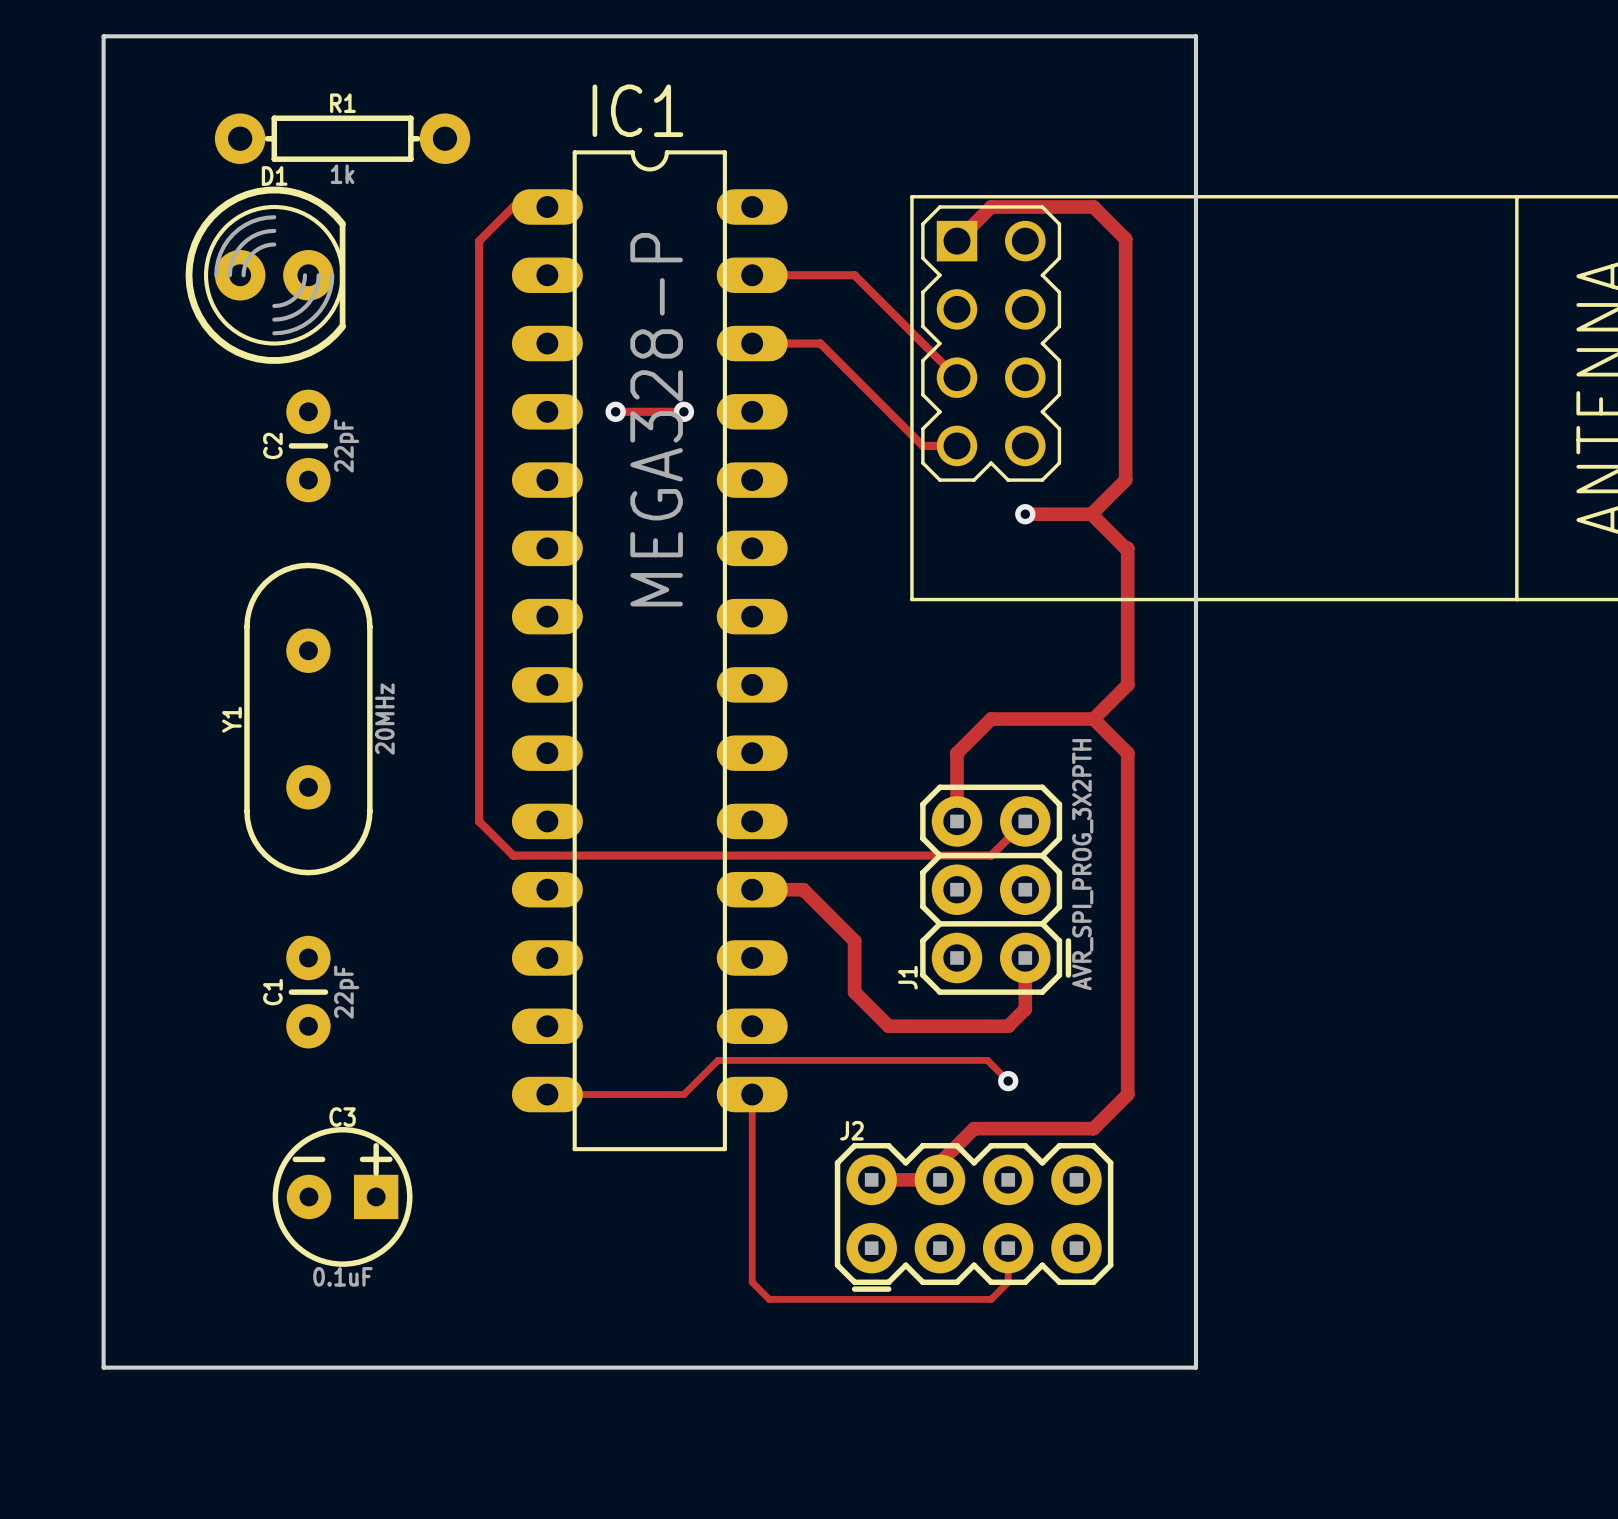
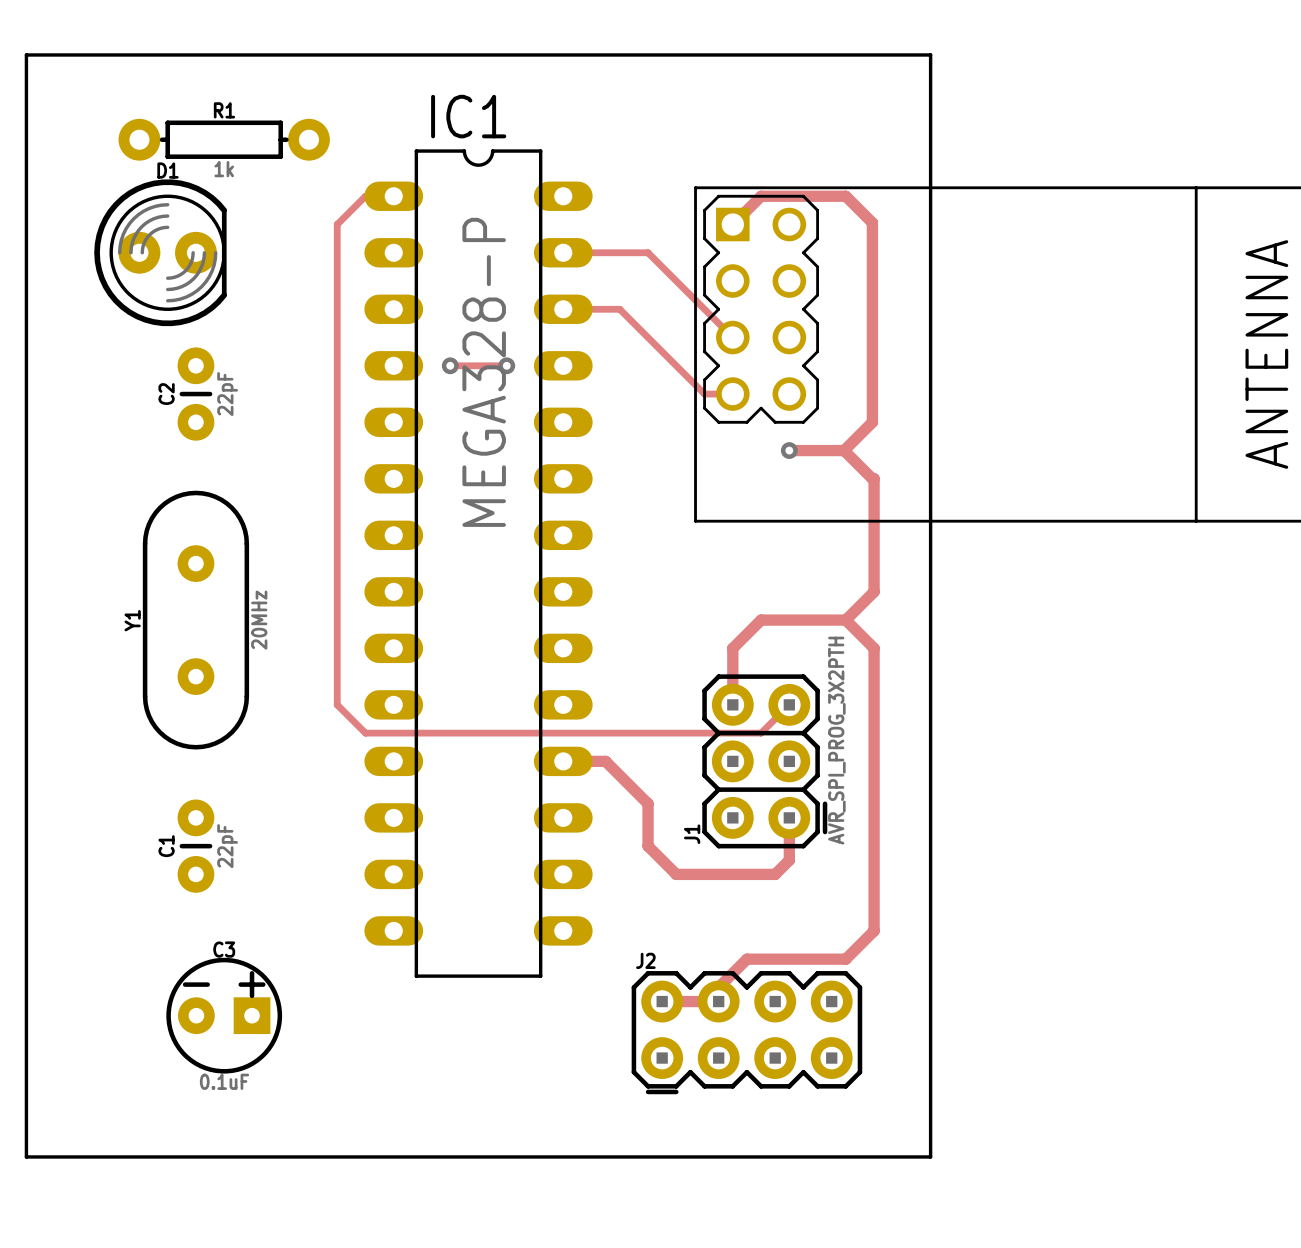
track: (1008, 1081) (987, 1060) (718, 1060) (683, 1094) (547, 1094) -> none
via: (1008, 1081) -> none
track: (752, 1094) (752, 1282) (769, 1299) (991, 1299) (1008, 1282) (1008, 1248) -> none

